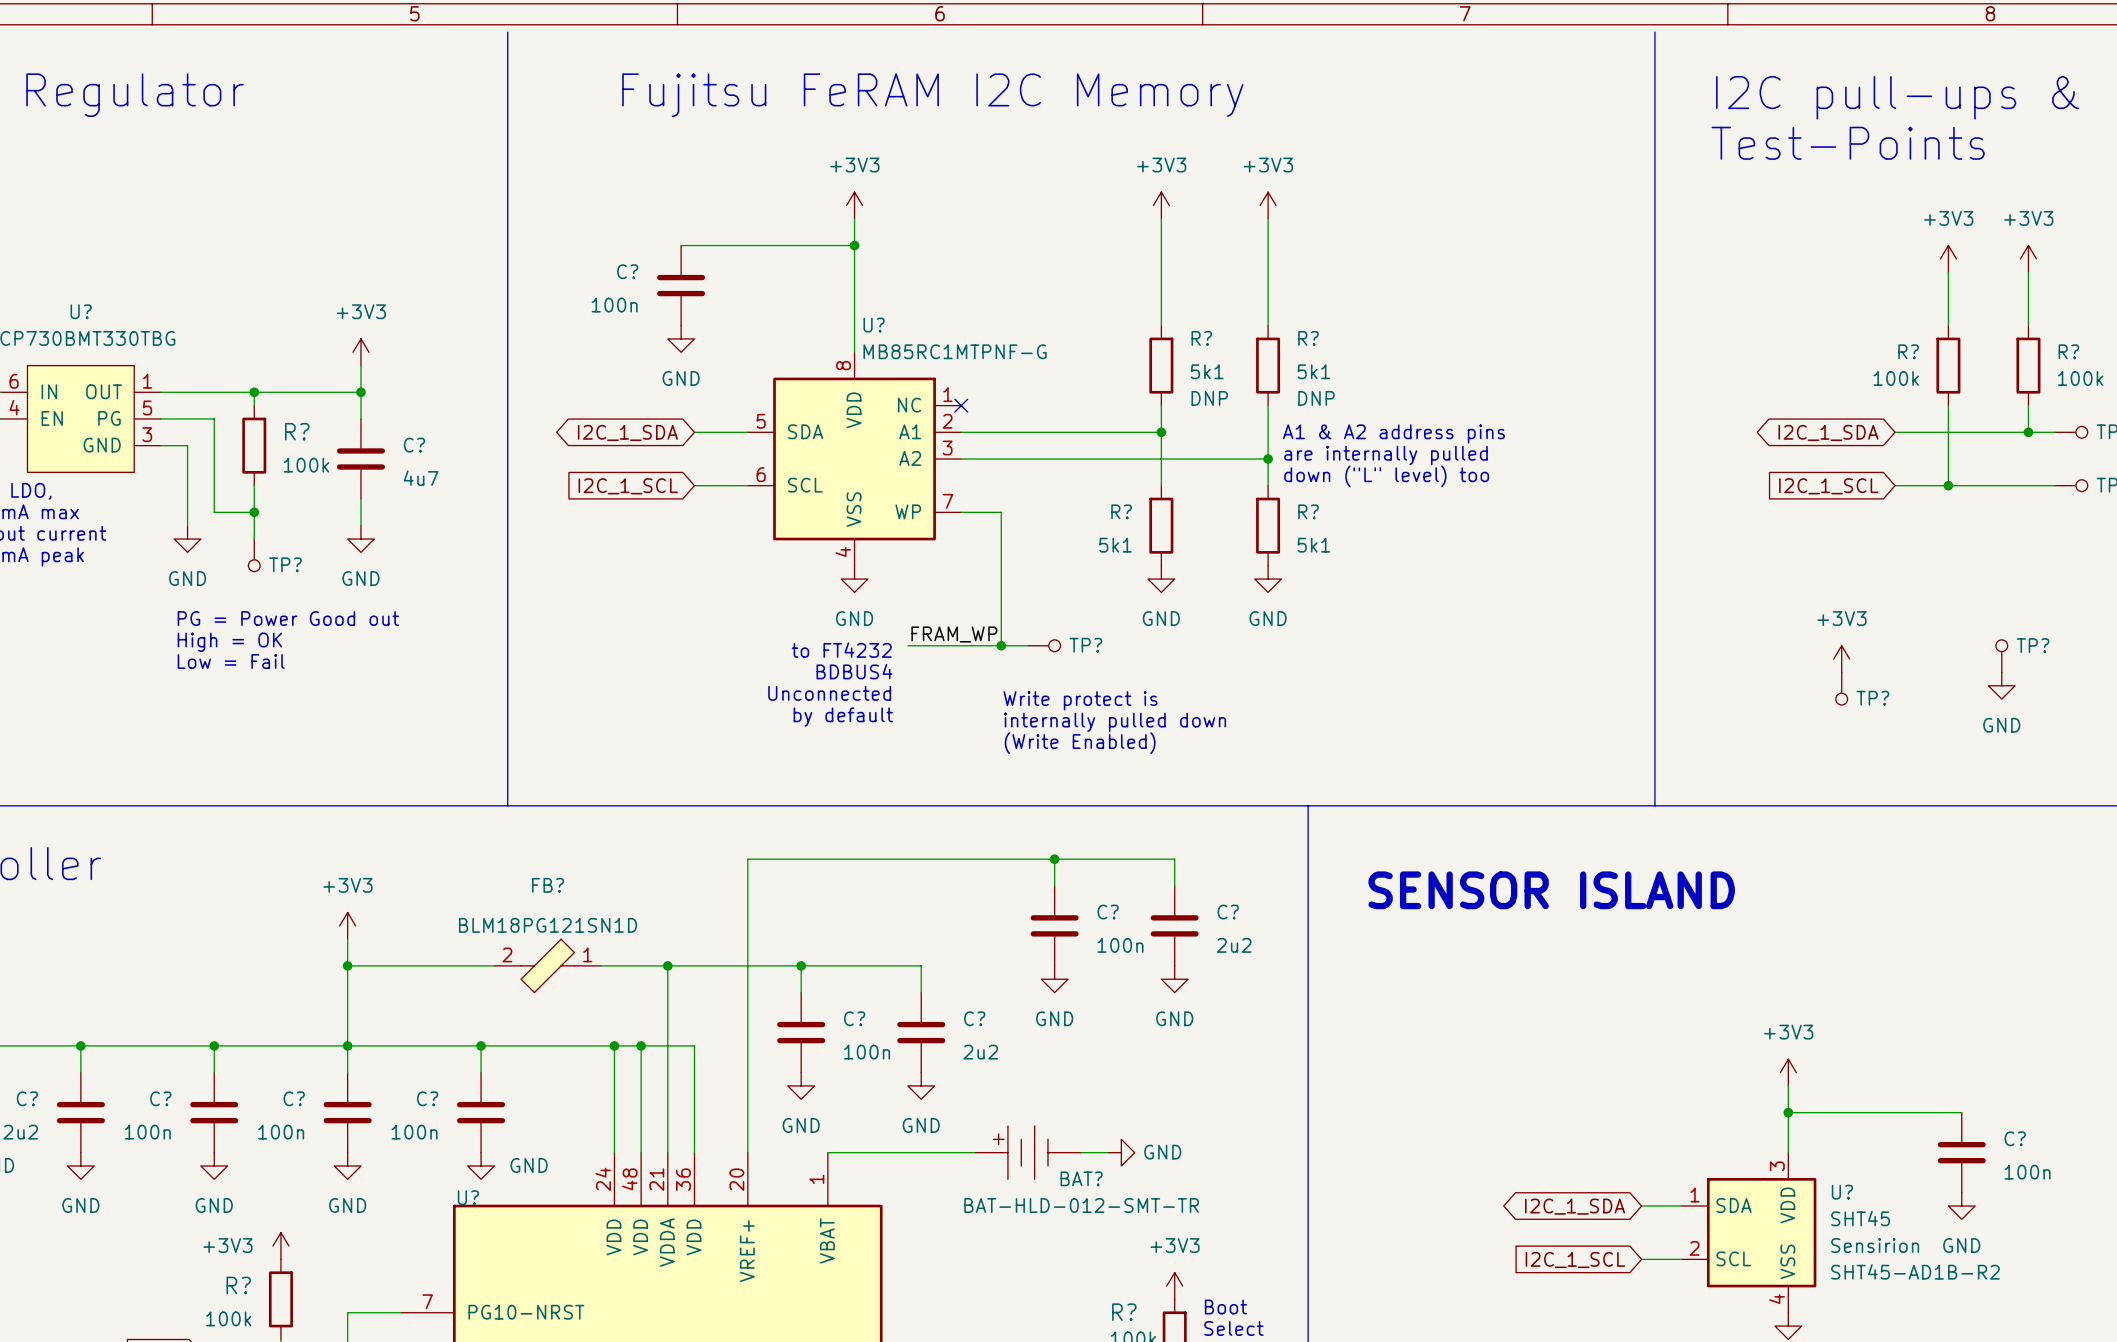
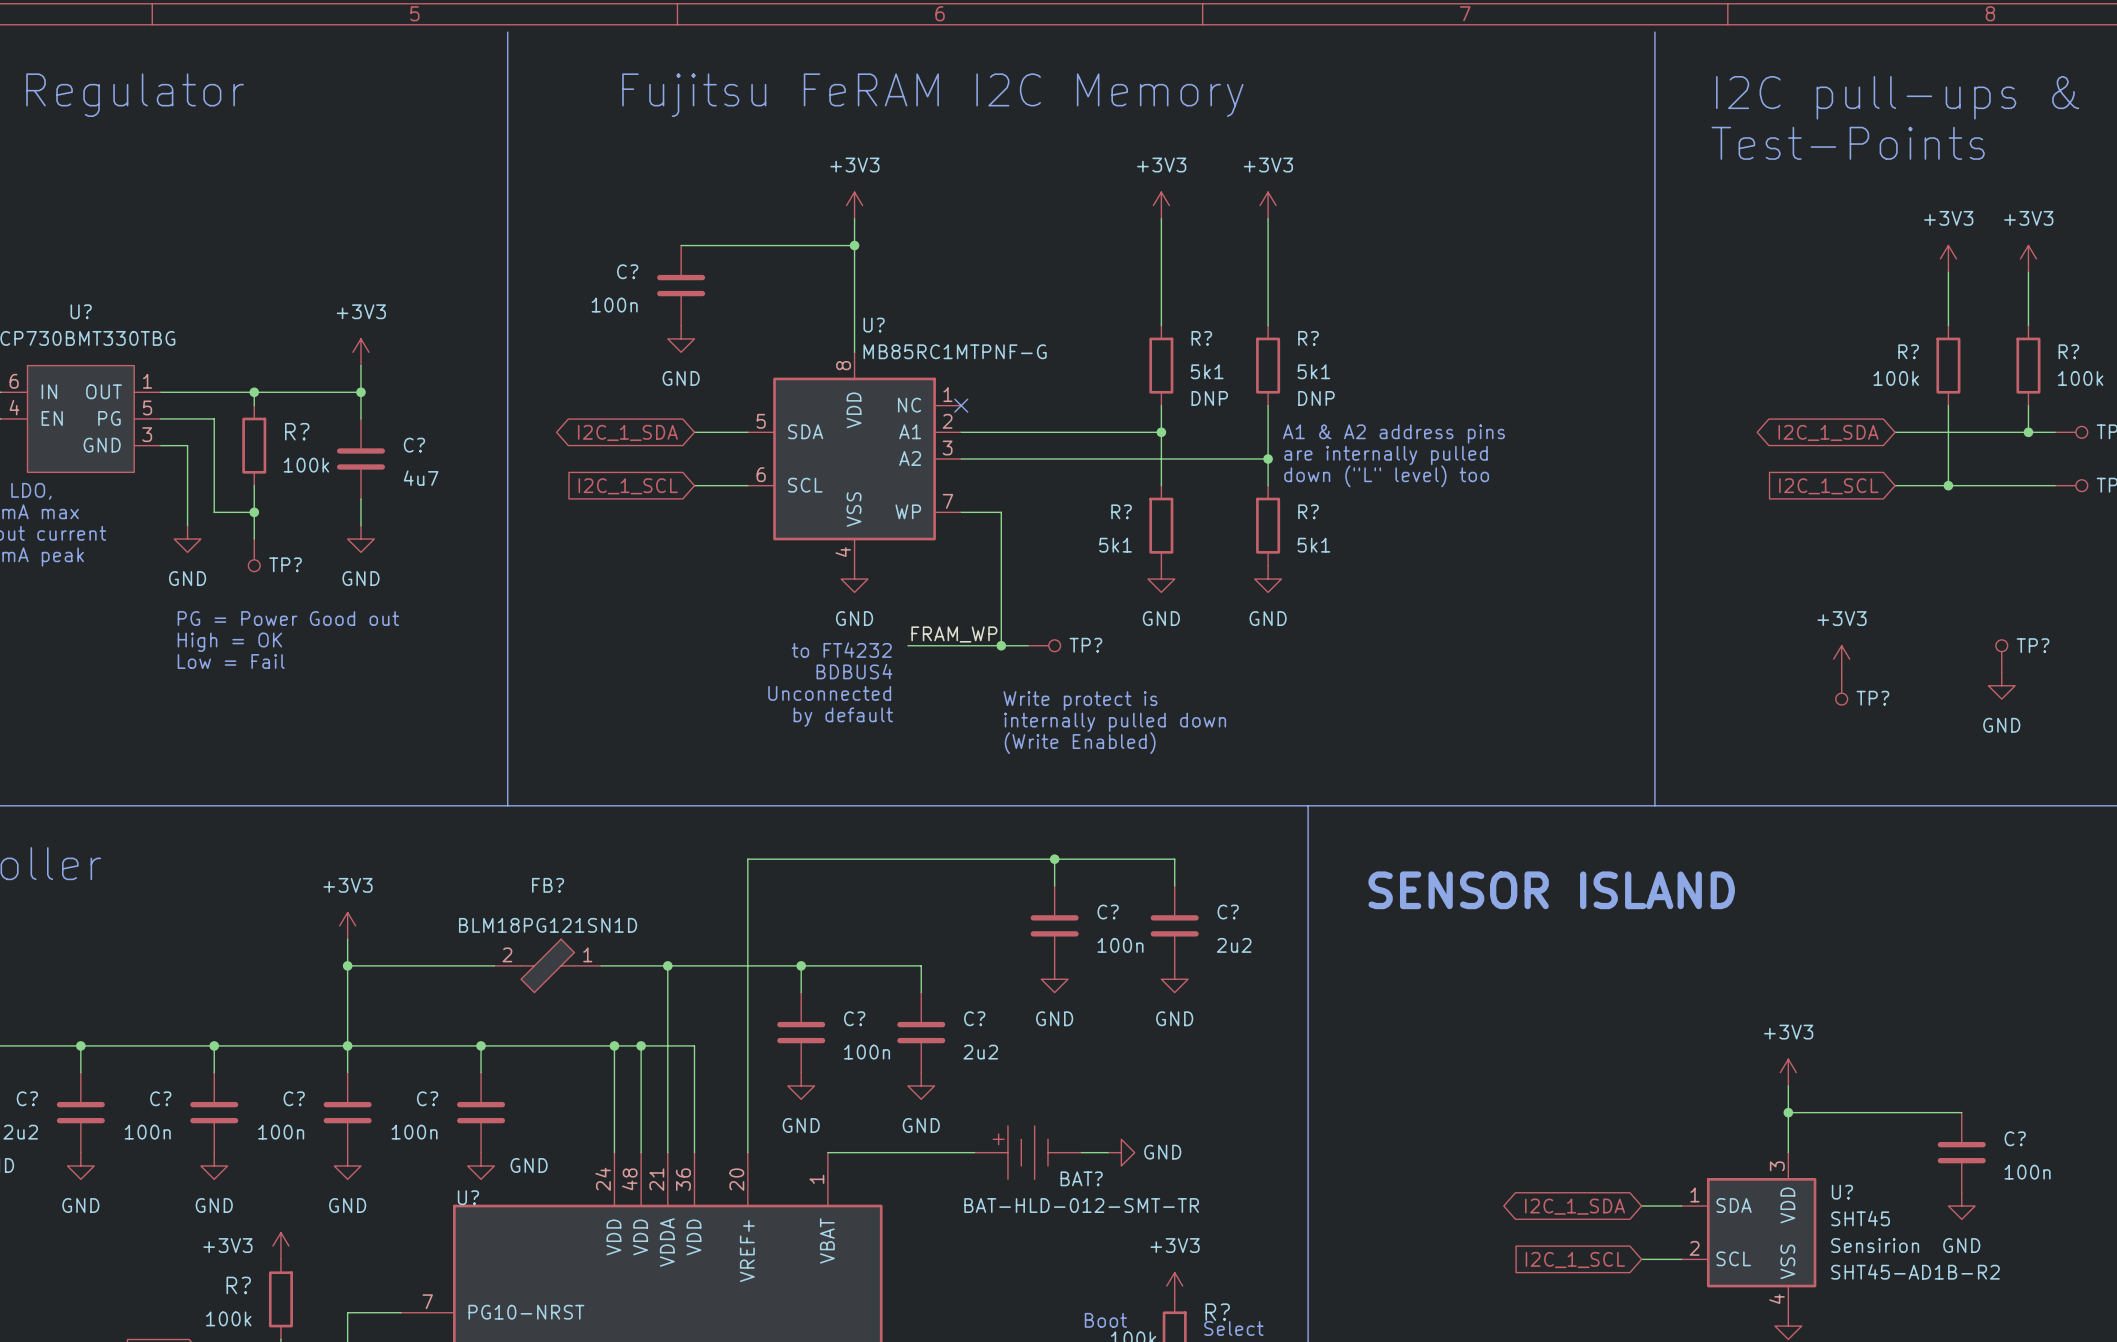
text position: Boot (1225, 1307) -> Boot (1105, 1320)
R? name position: R? (1124, 1312) -> R? (1217, 1312)

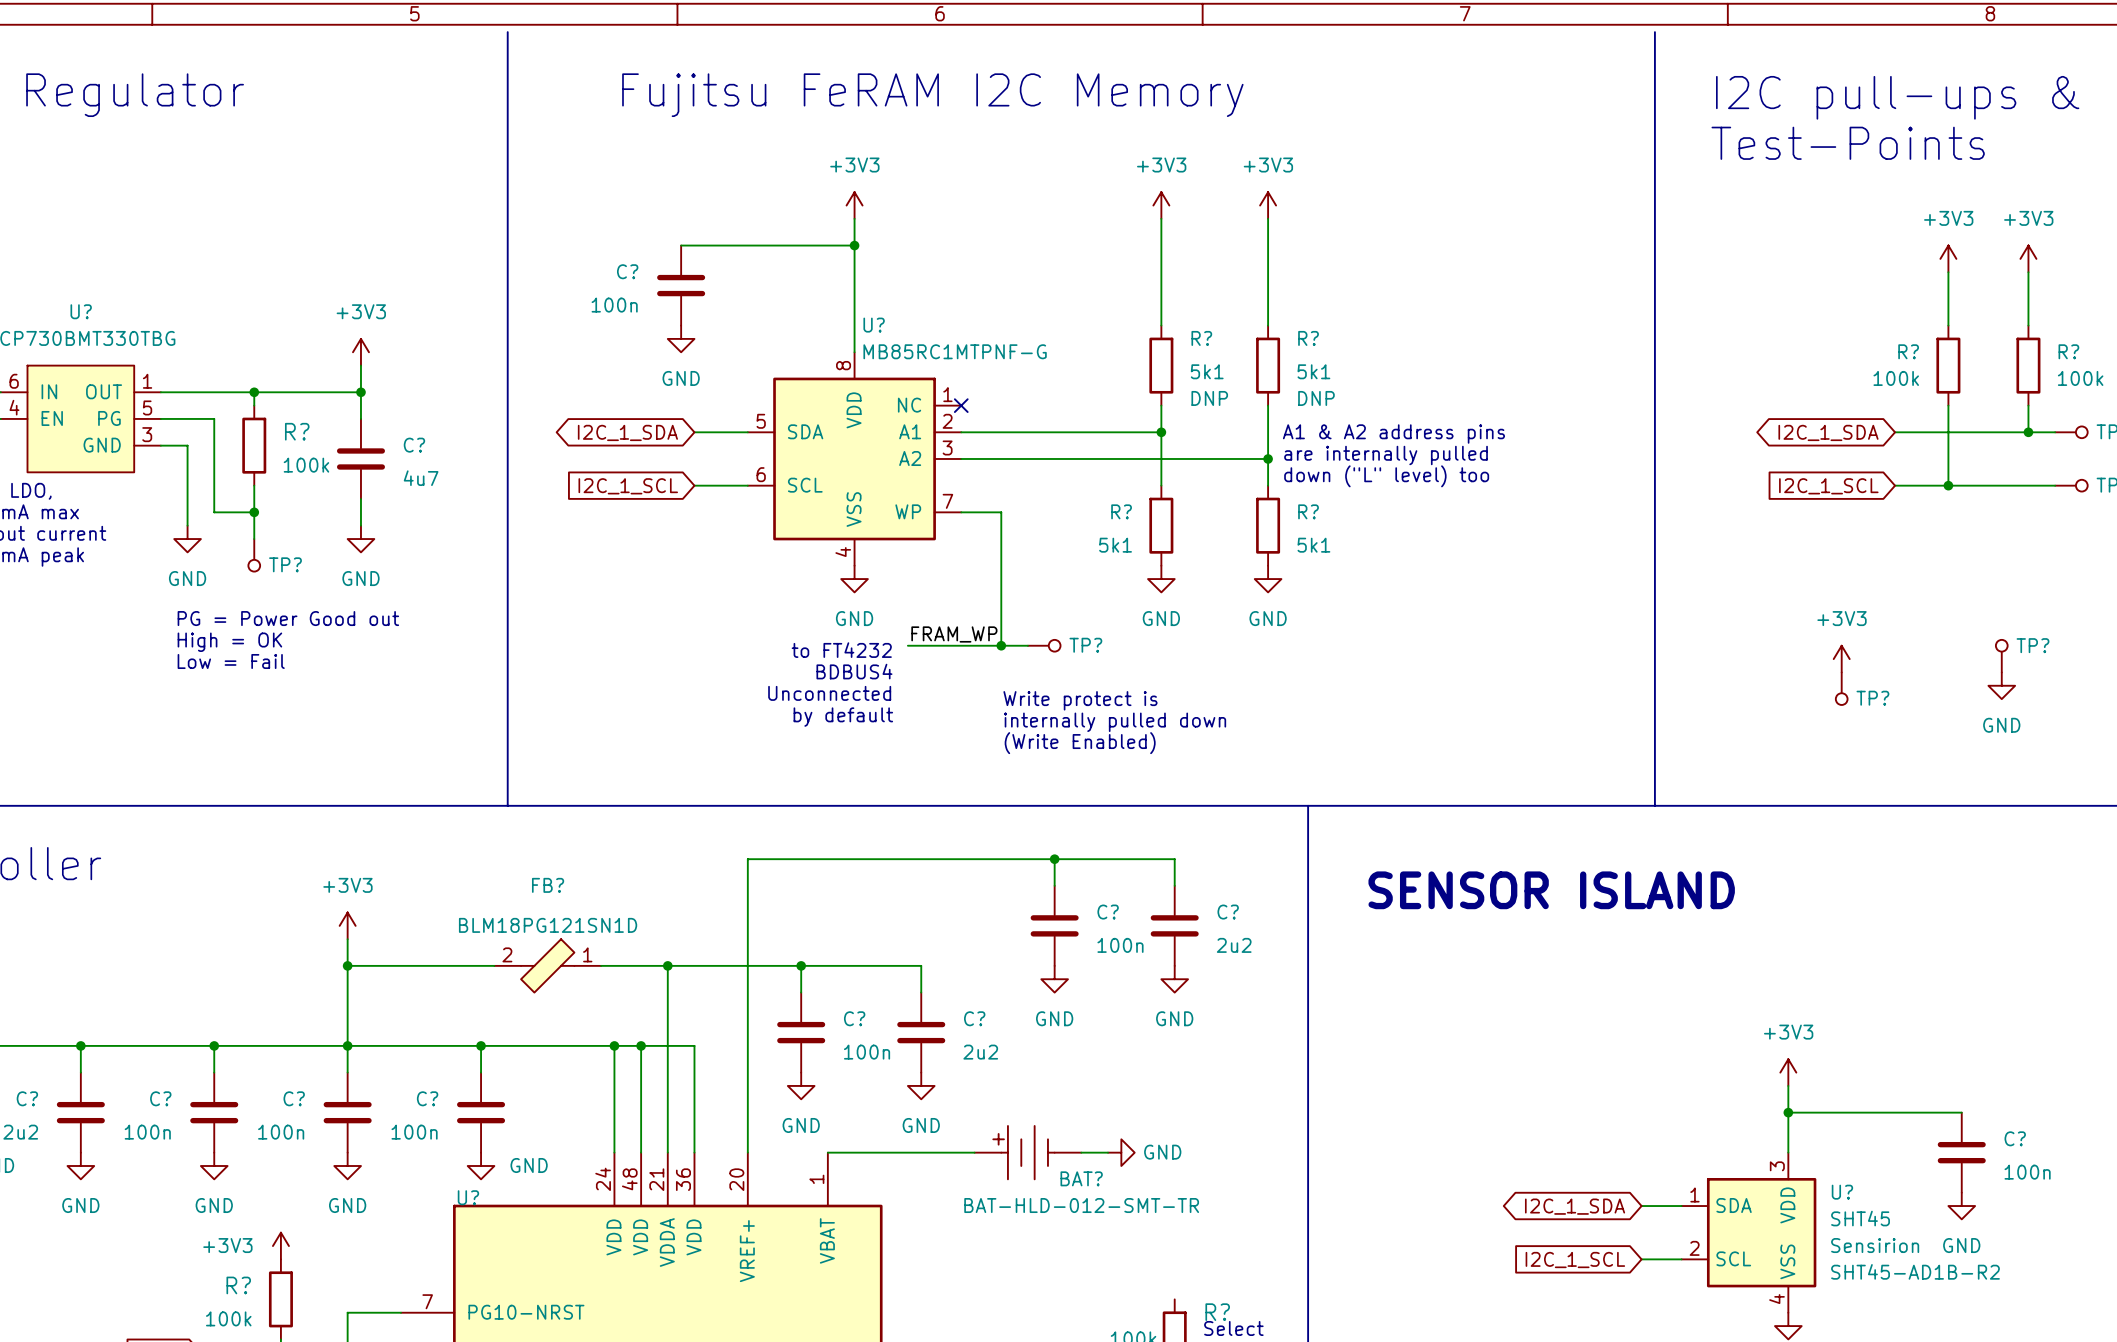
power symbol: +3V3 (1174, 1286) -> none
text: Boot (1105, 1320) -> none

